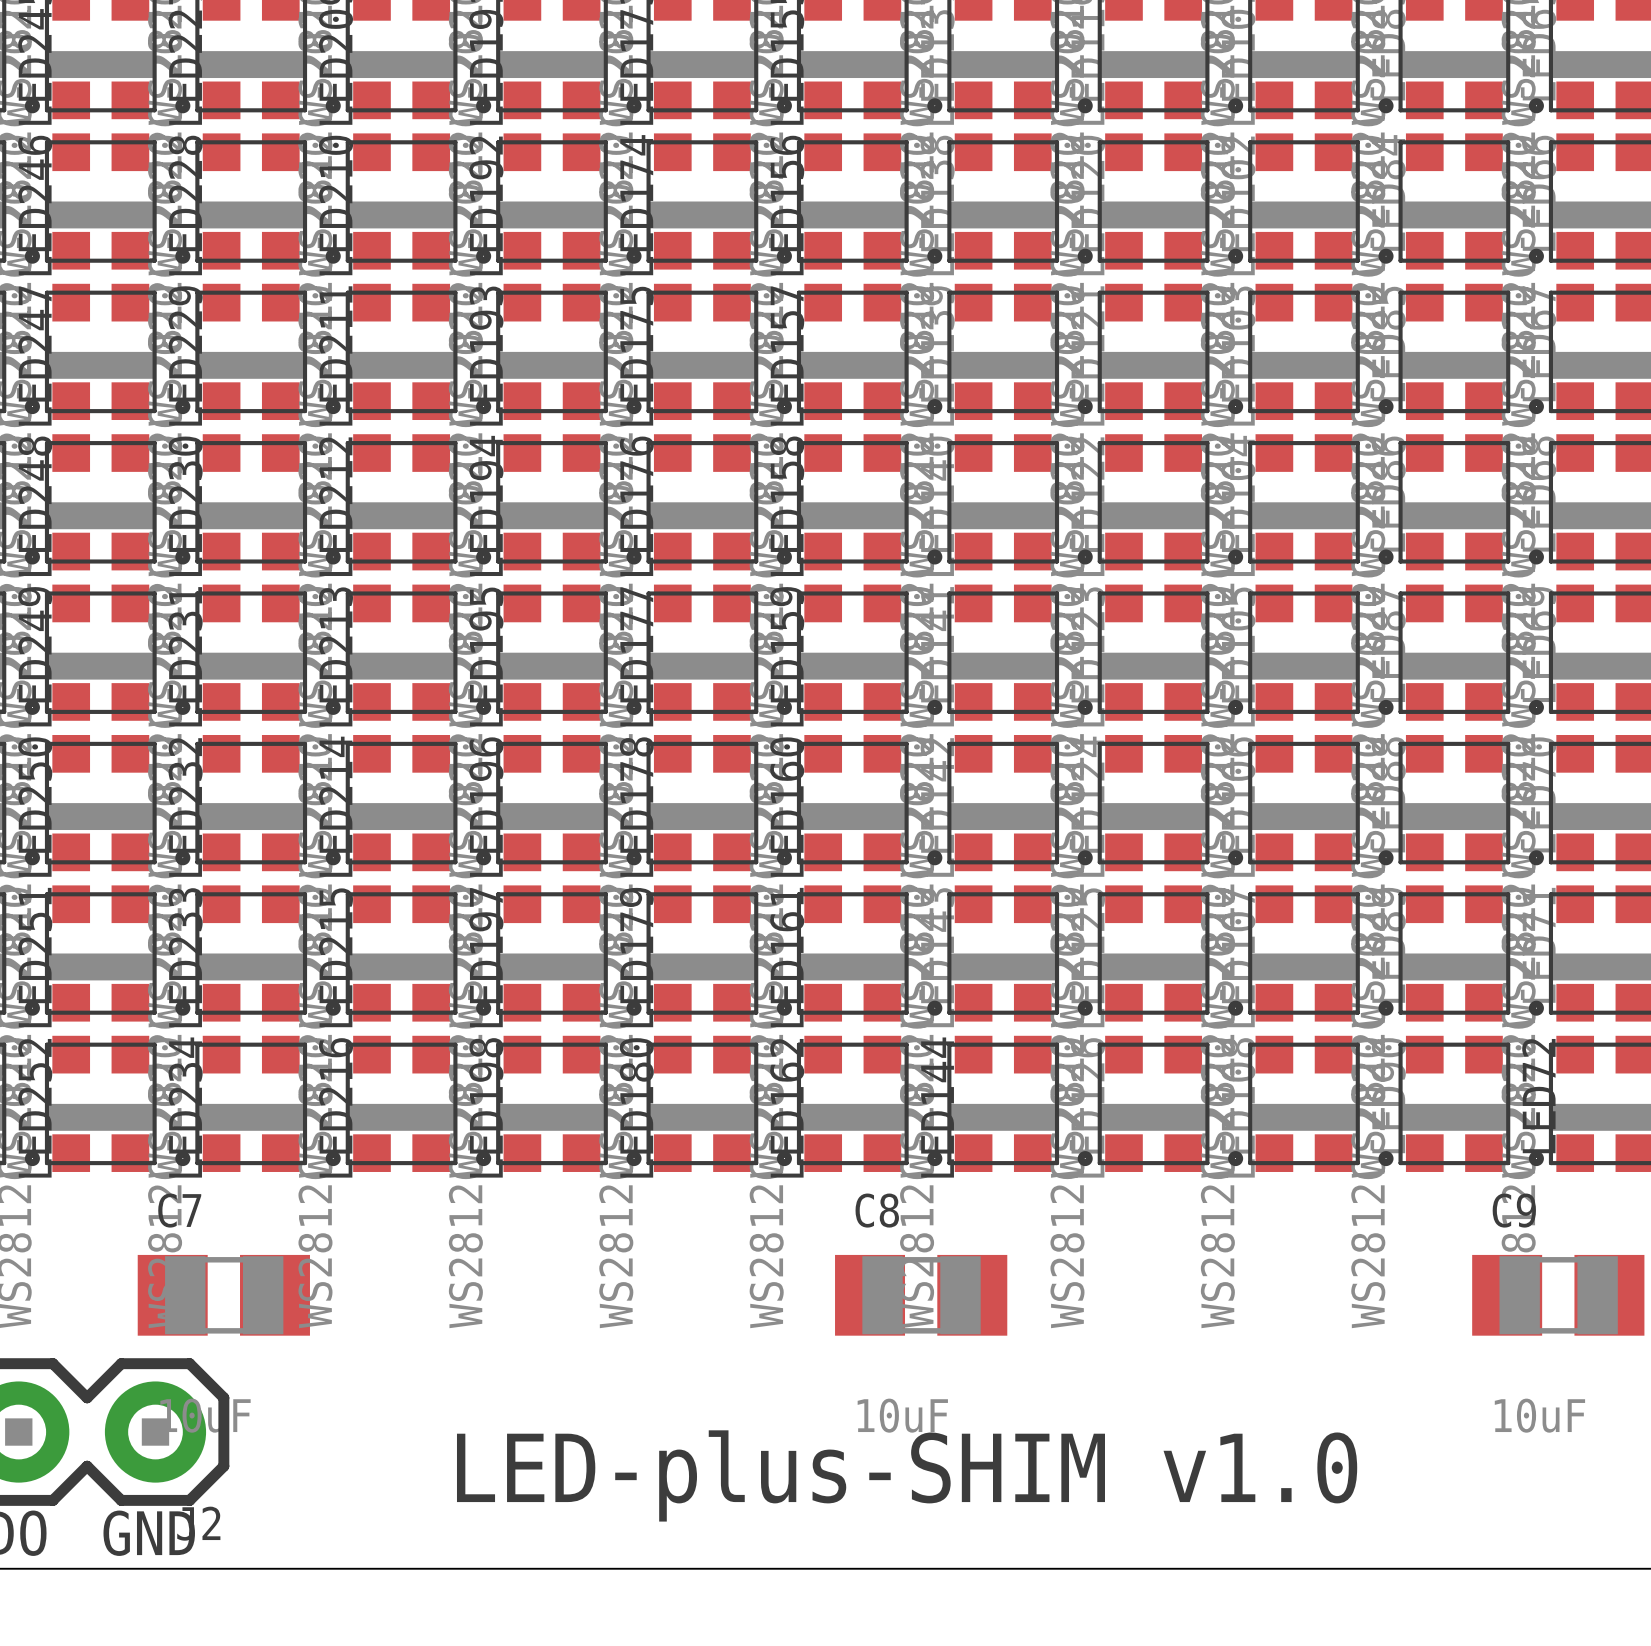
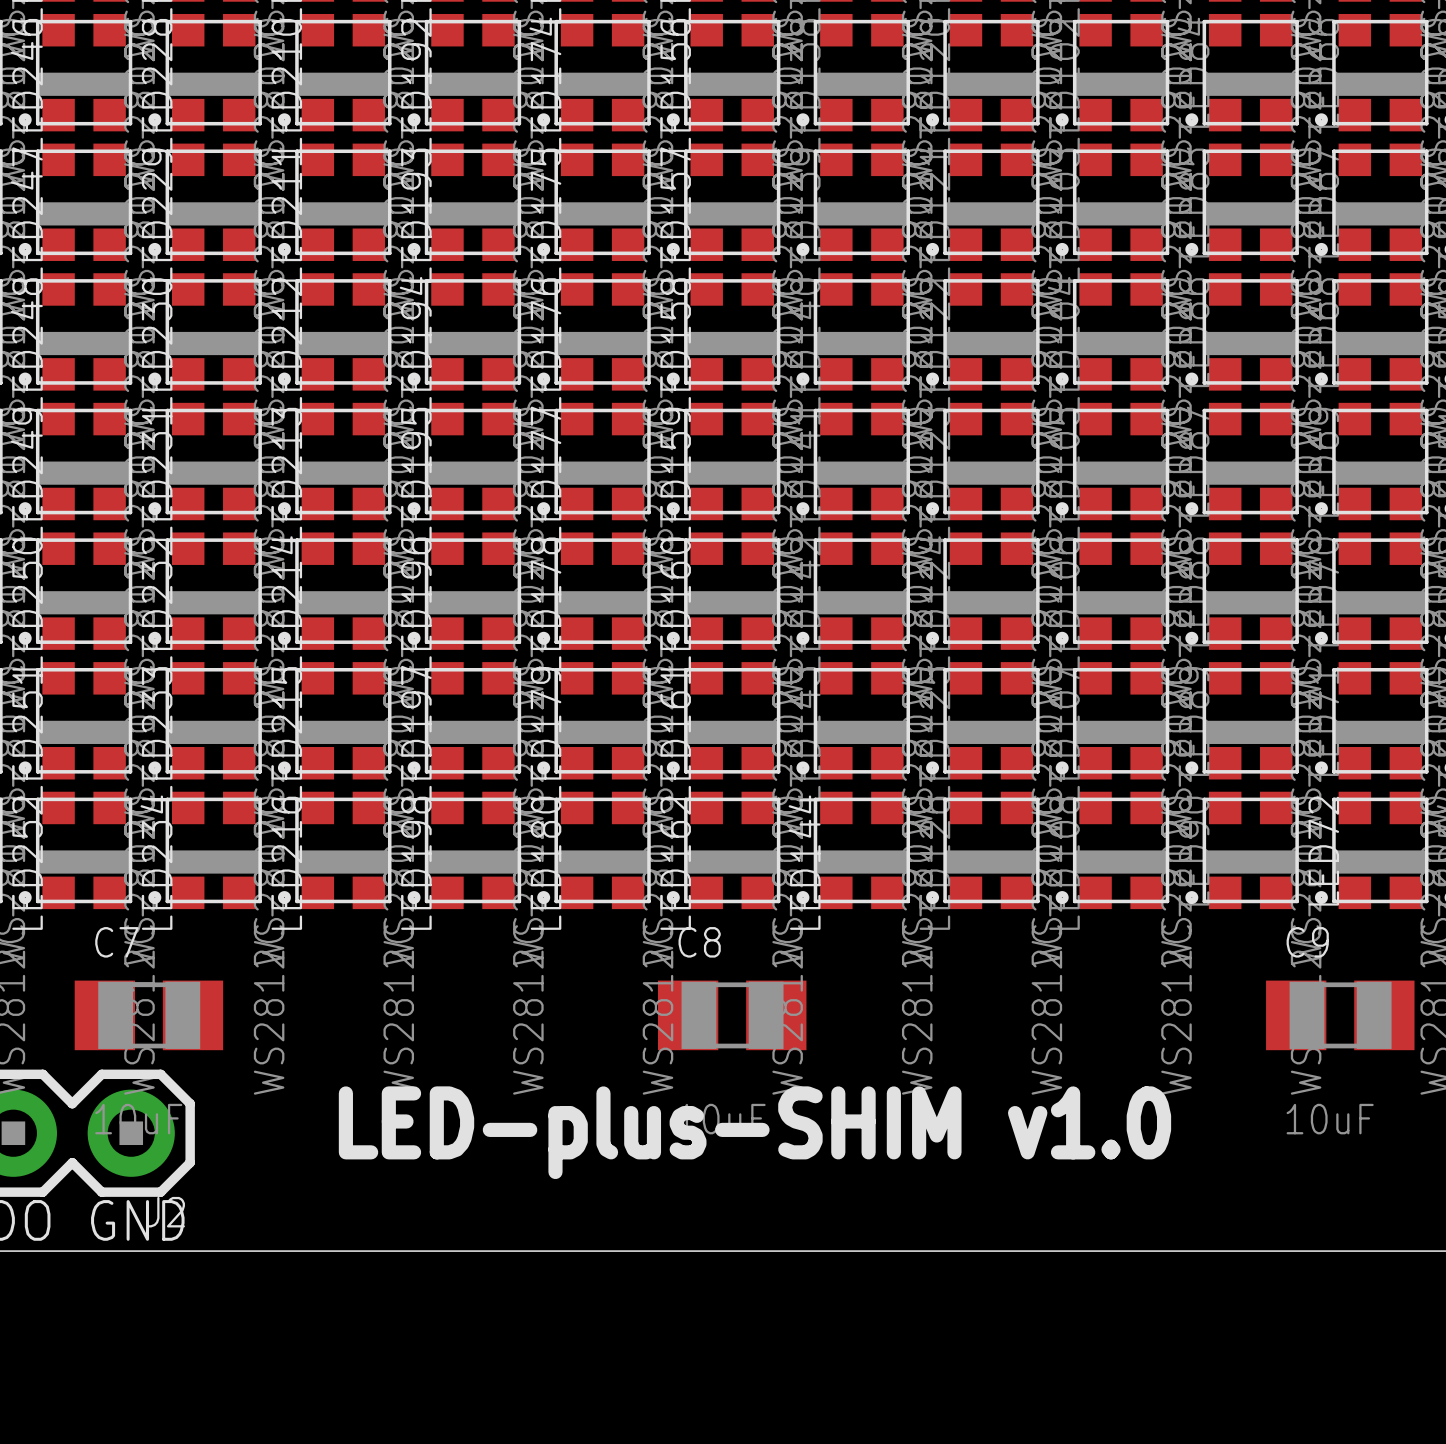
C7 position: (223, 1295) -> (148, 1015)
C8 position: (921, 1295) -> (732, 1015)
text position: LED-plus-SHIM v1.0 (907, 1475) -> LED-plus-SHIM v1.0 (754, 1132)

